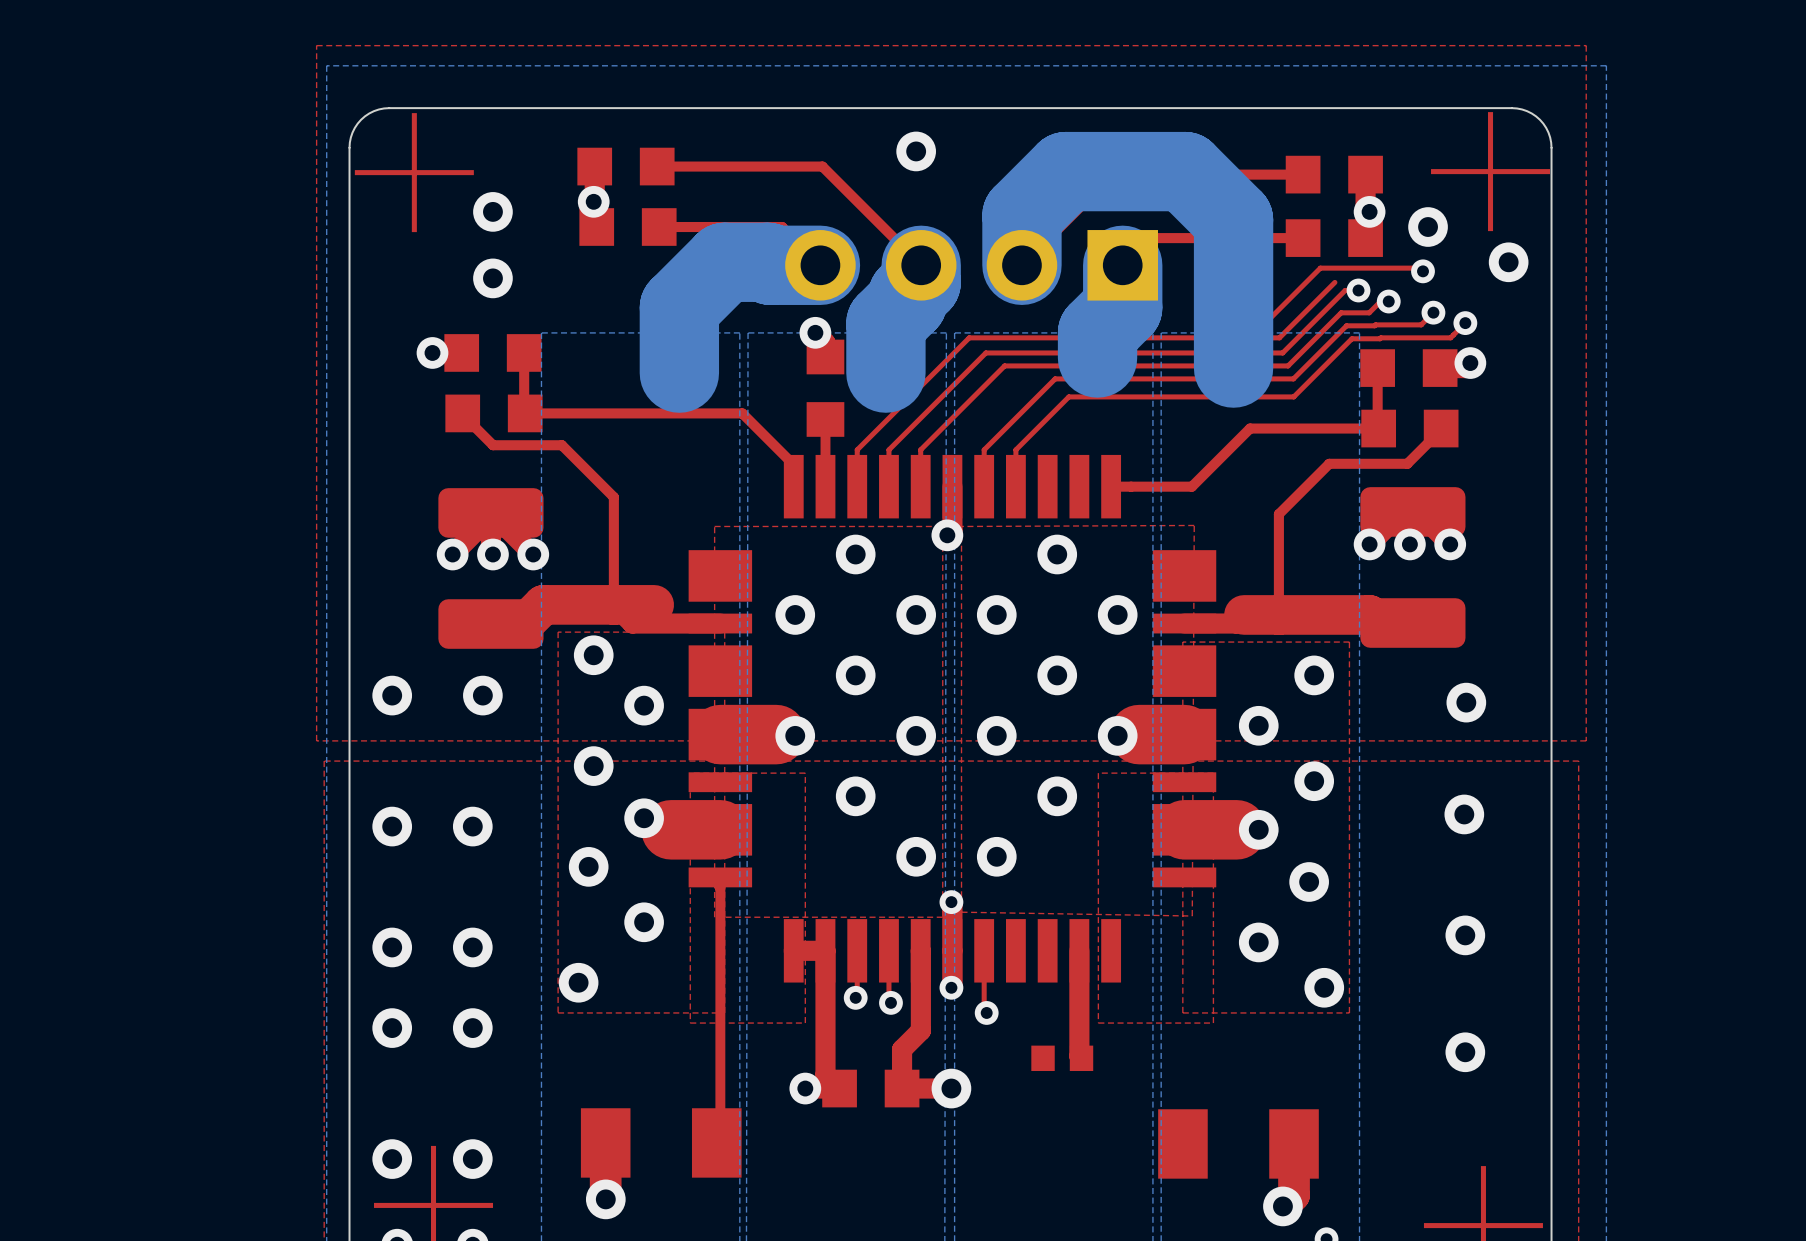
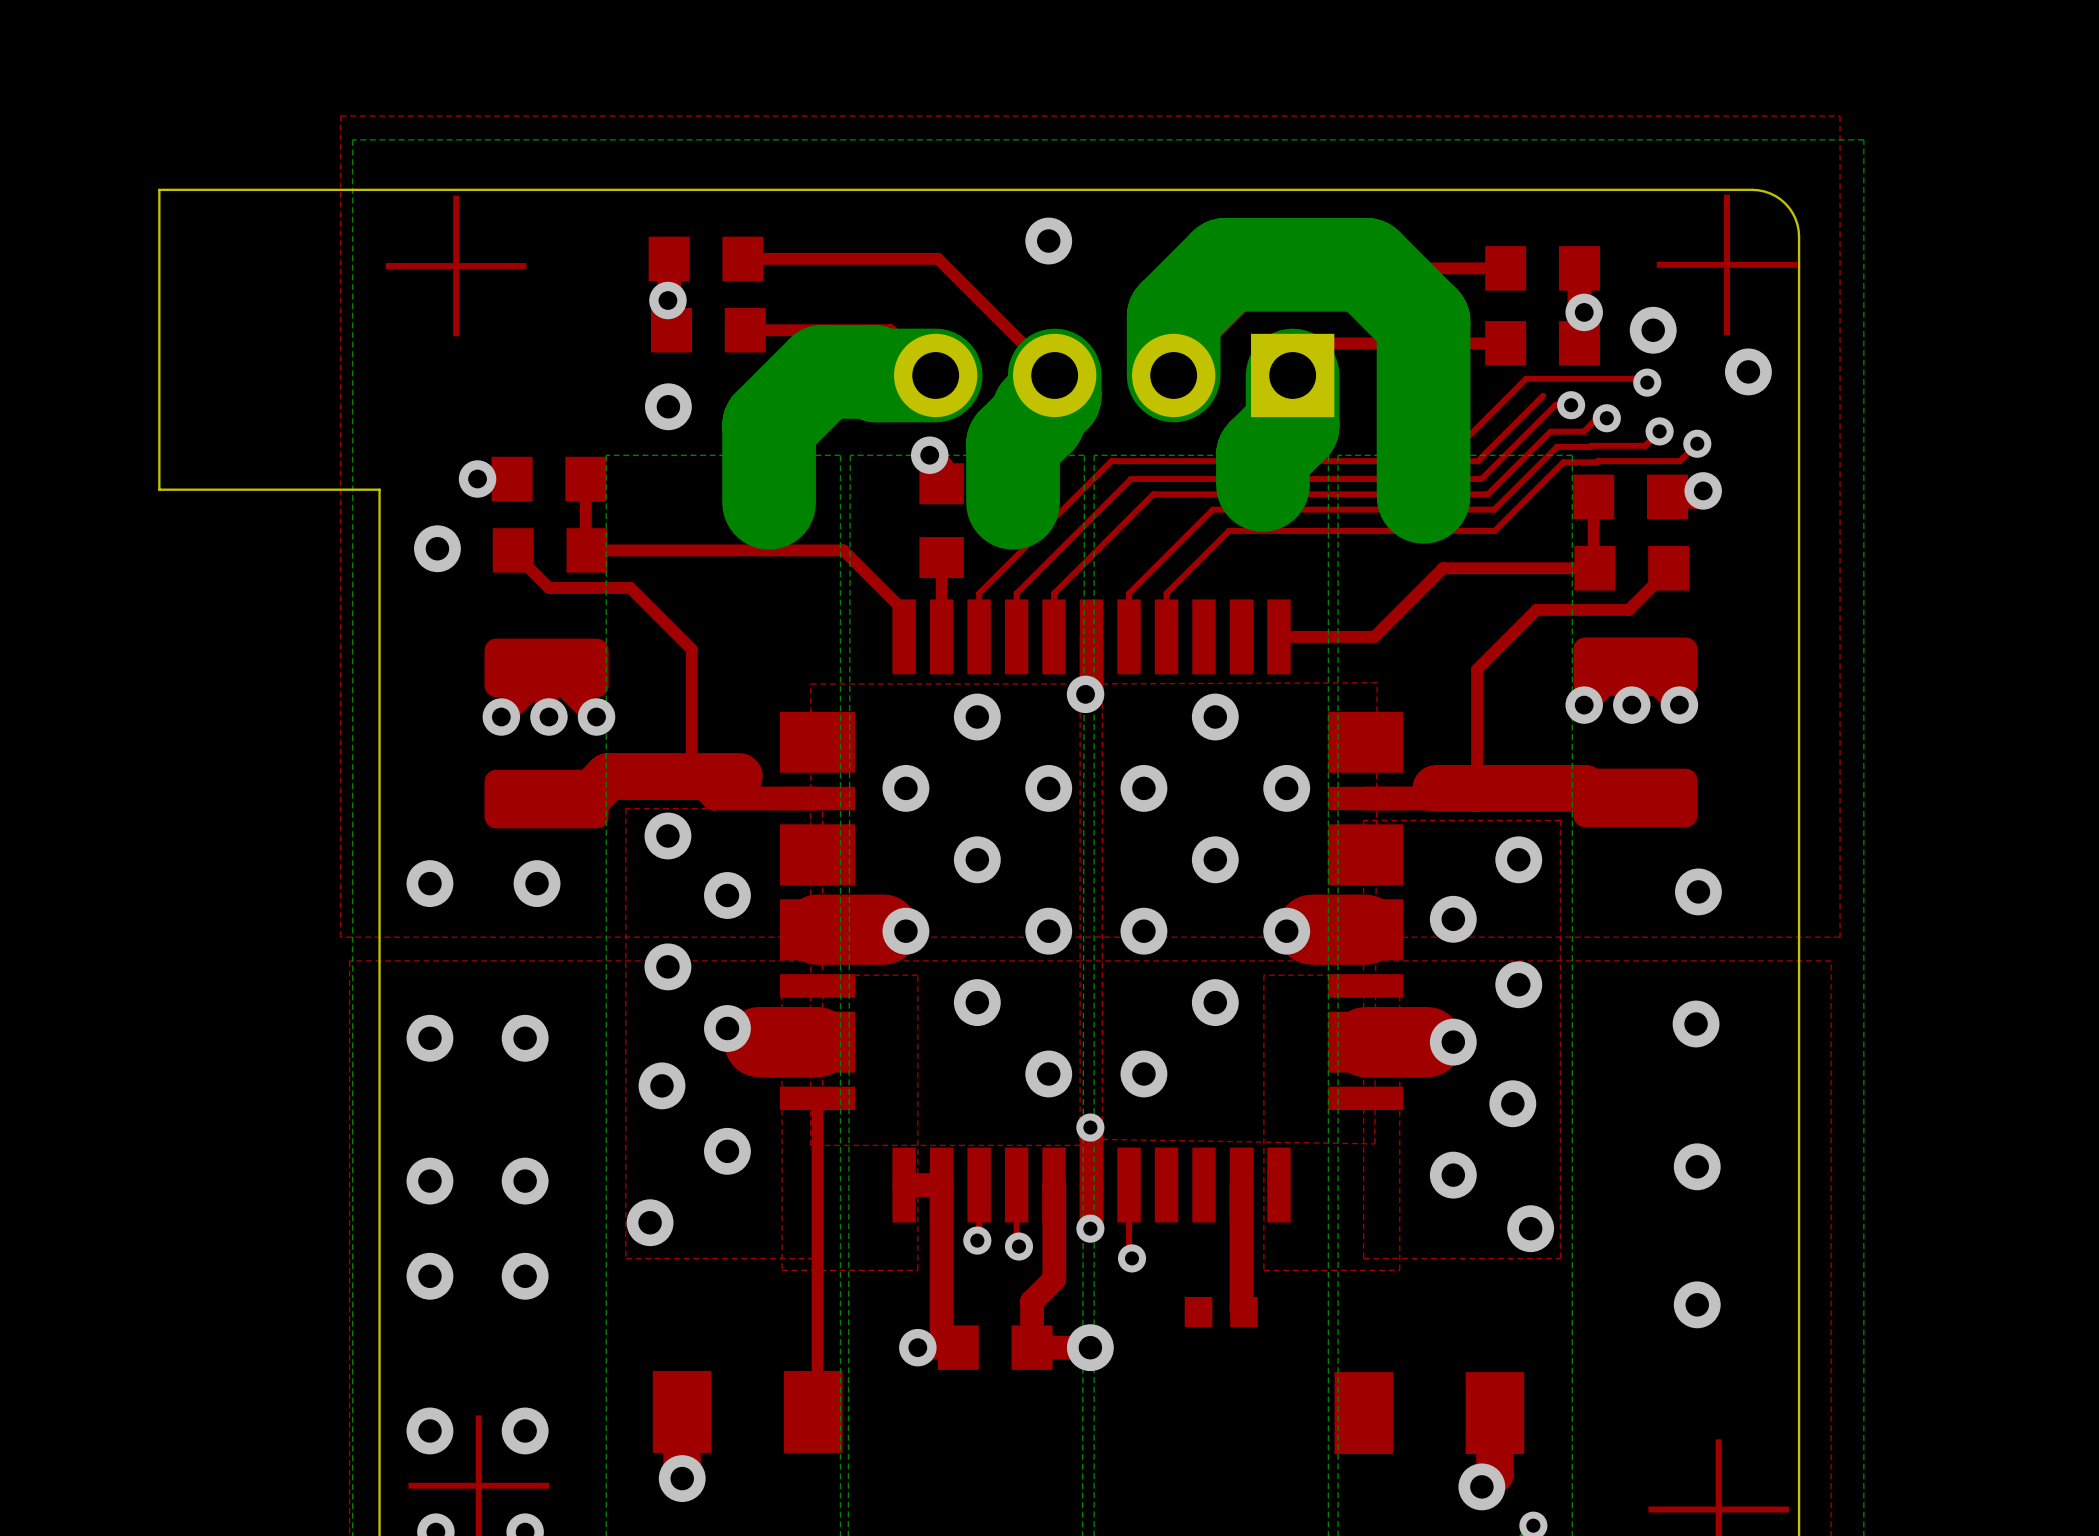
board edge: (389, 108) (373, 111) (361, 119) (354, 127) (349, 142) (349, 362) -> (426, 189) (159, 189) (159, 489) (379, 489)
via: (492, 211) -> none
via: (492, 278) -> none
via: none -> (668, 406)
via: none -> (437, 548)

